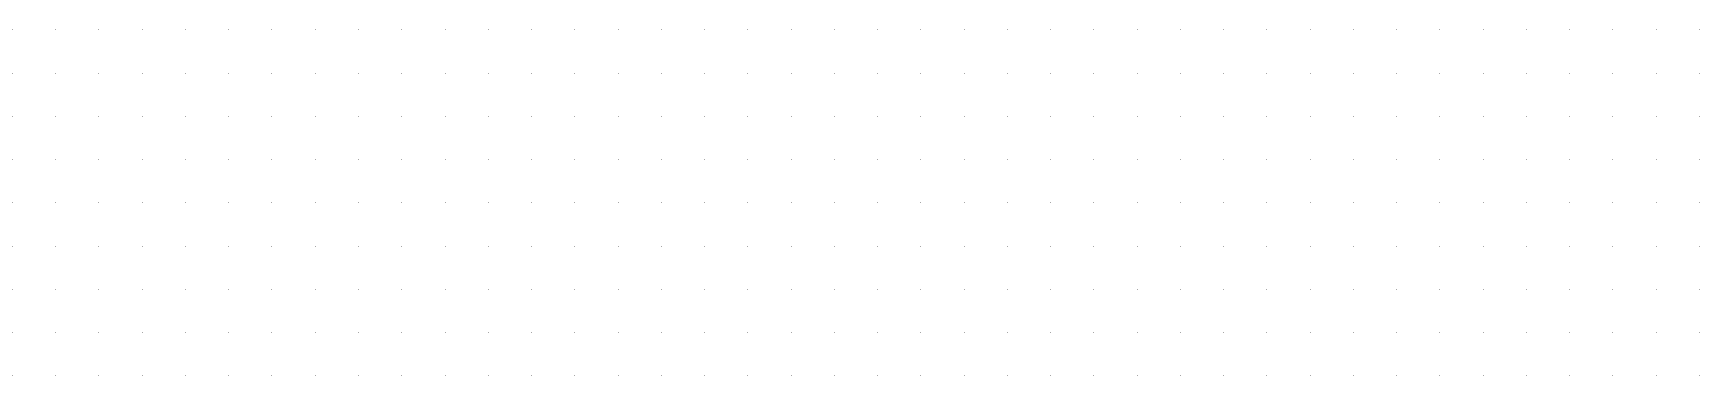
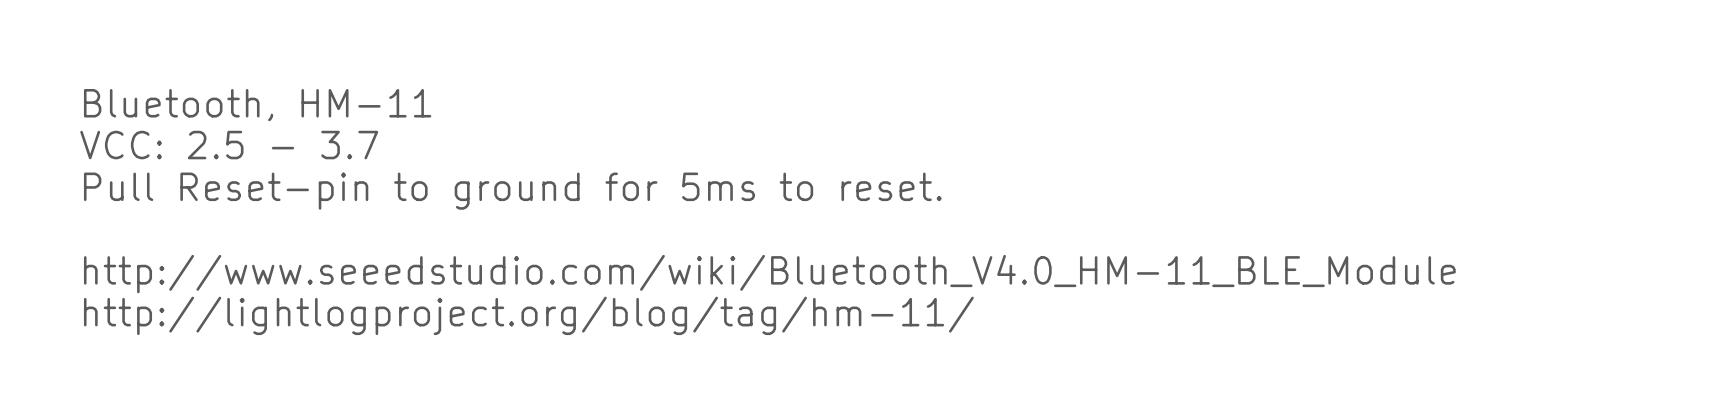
text: none -> Bluetooth, HM-11 (257, 105)
text: none -> VCC: 2.5 - 3.7 (229, 145)
text: none -> Pull Reset-pin to ground for 5ms to reset. (512, 191)
text: none -> http://www.seeedstudio.com/wiki/Bluetooth_V4.0_HM-11_BLE_Module (769, 274)
text: none -> http://lightlogproject.org/blog/tag/hm-11/ (528, 315)

